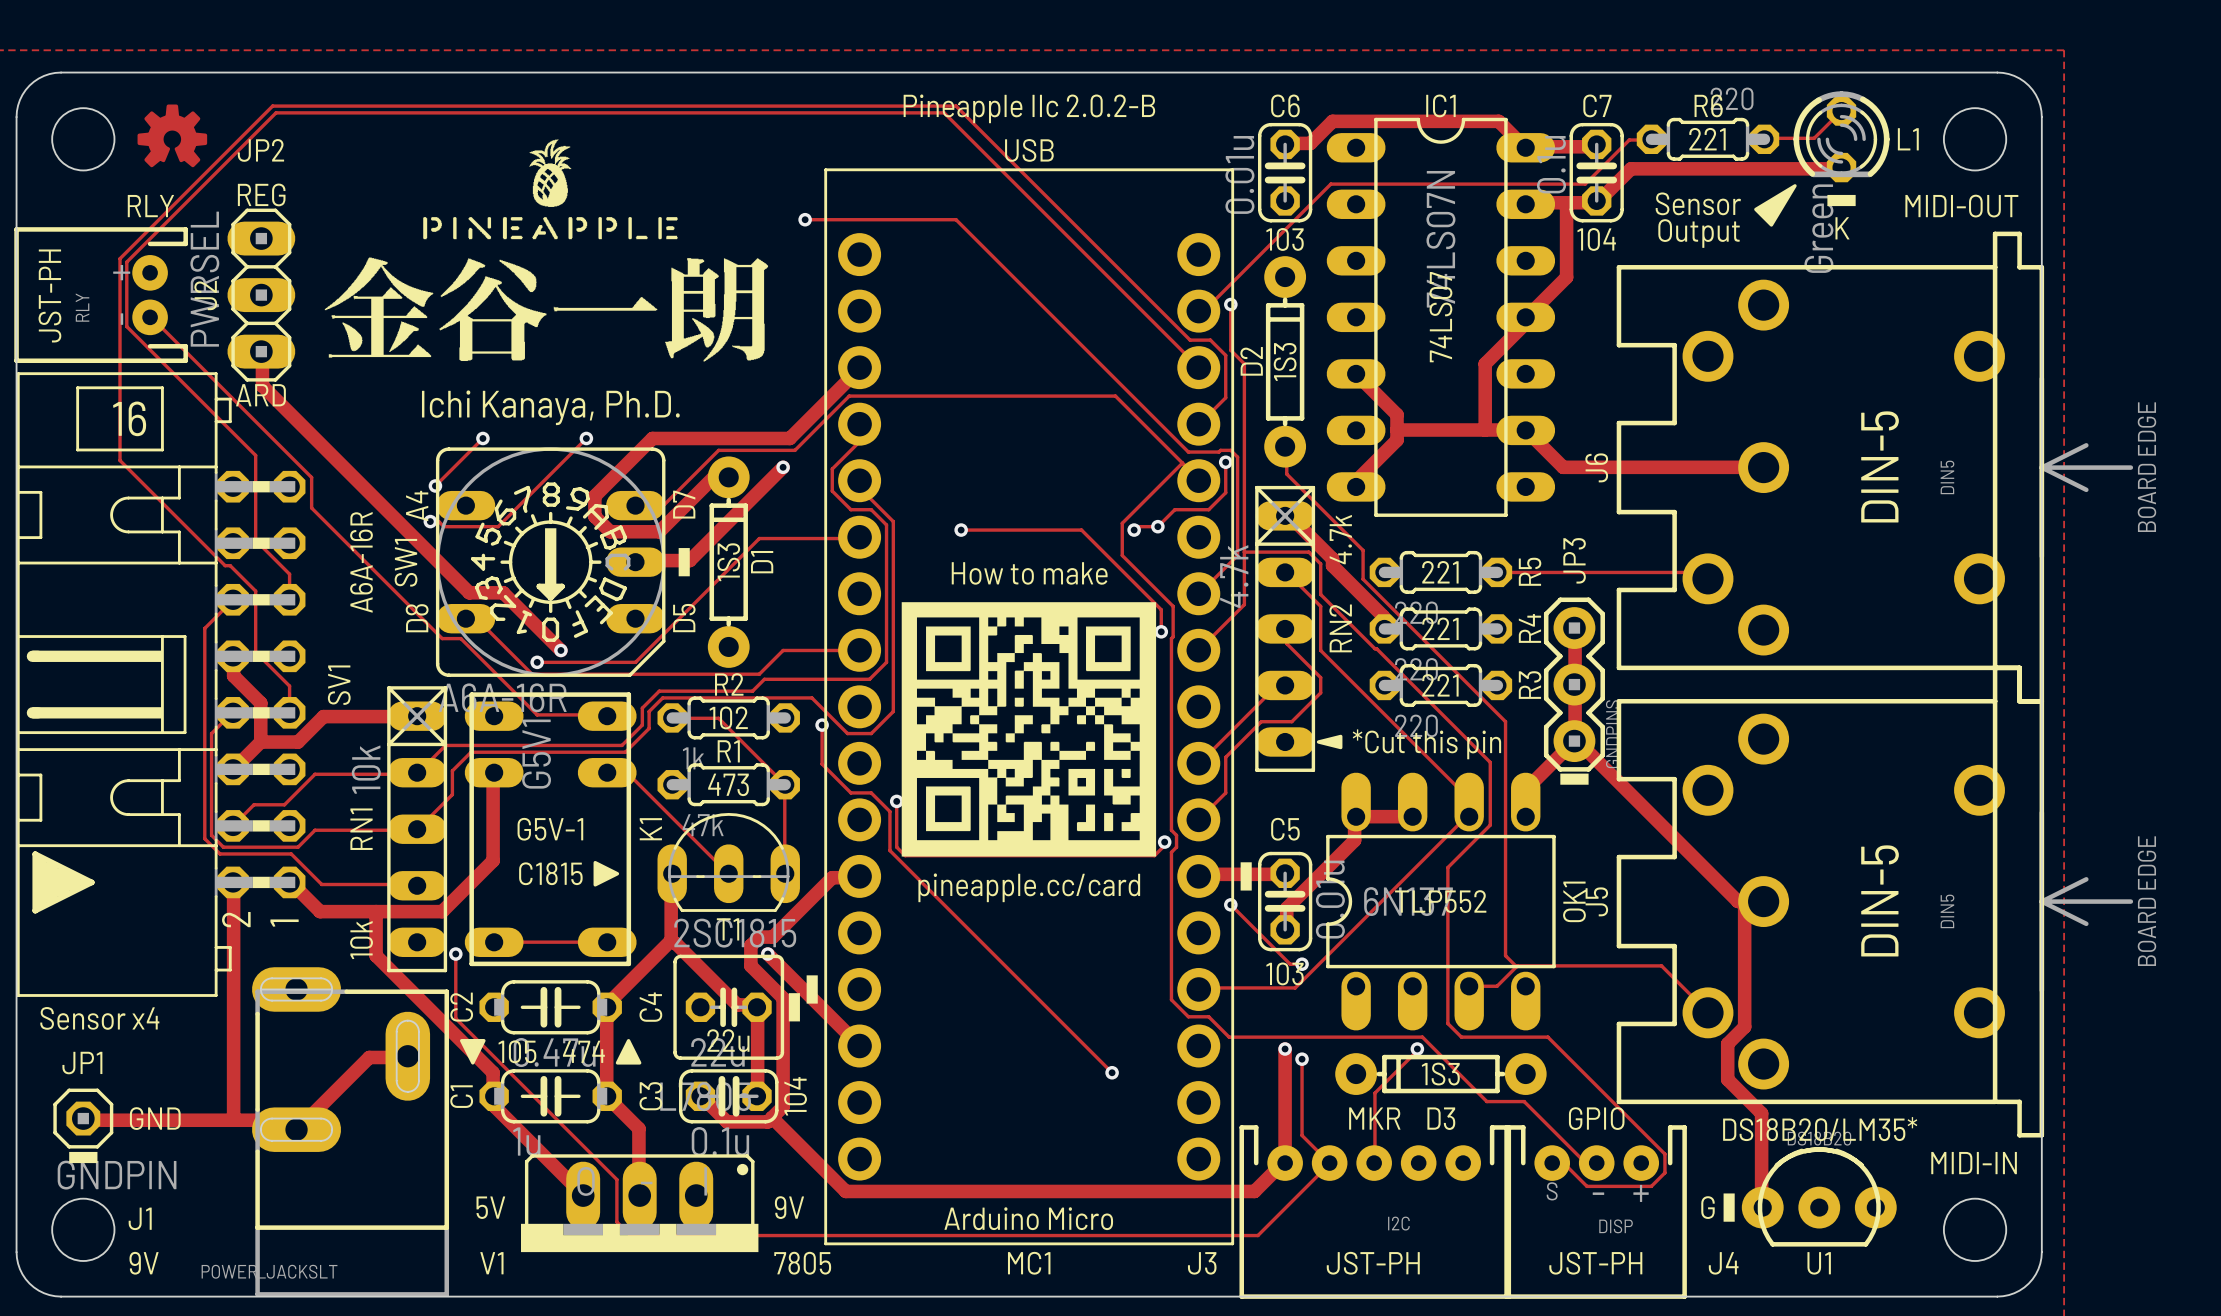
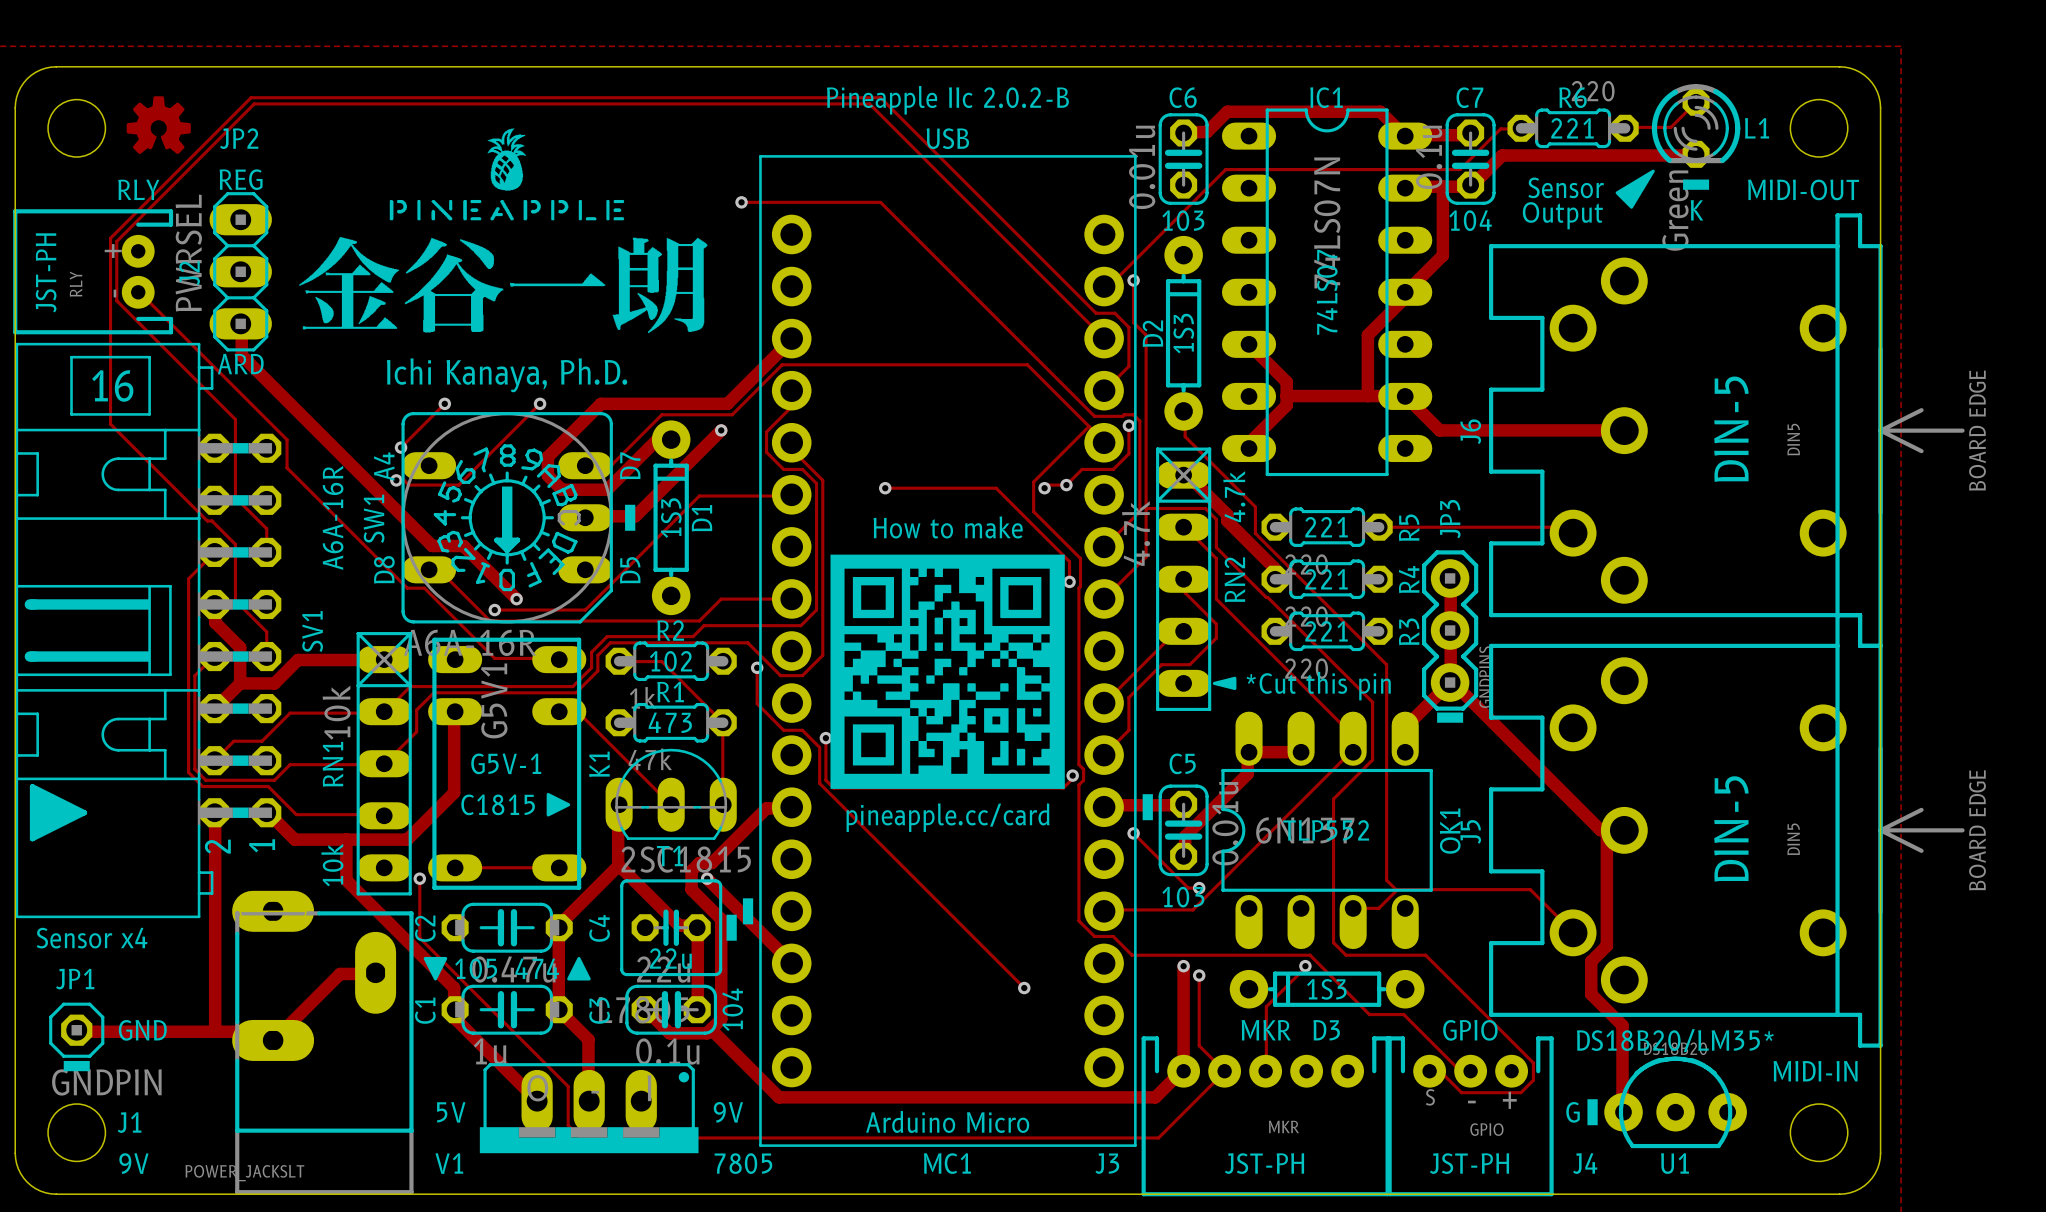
J3 value: I2C (1398, 1223) -> MKR (1283, 1126)
J4 value: DISP (1616, 1226) -> GPIO (1486, 1129)

